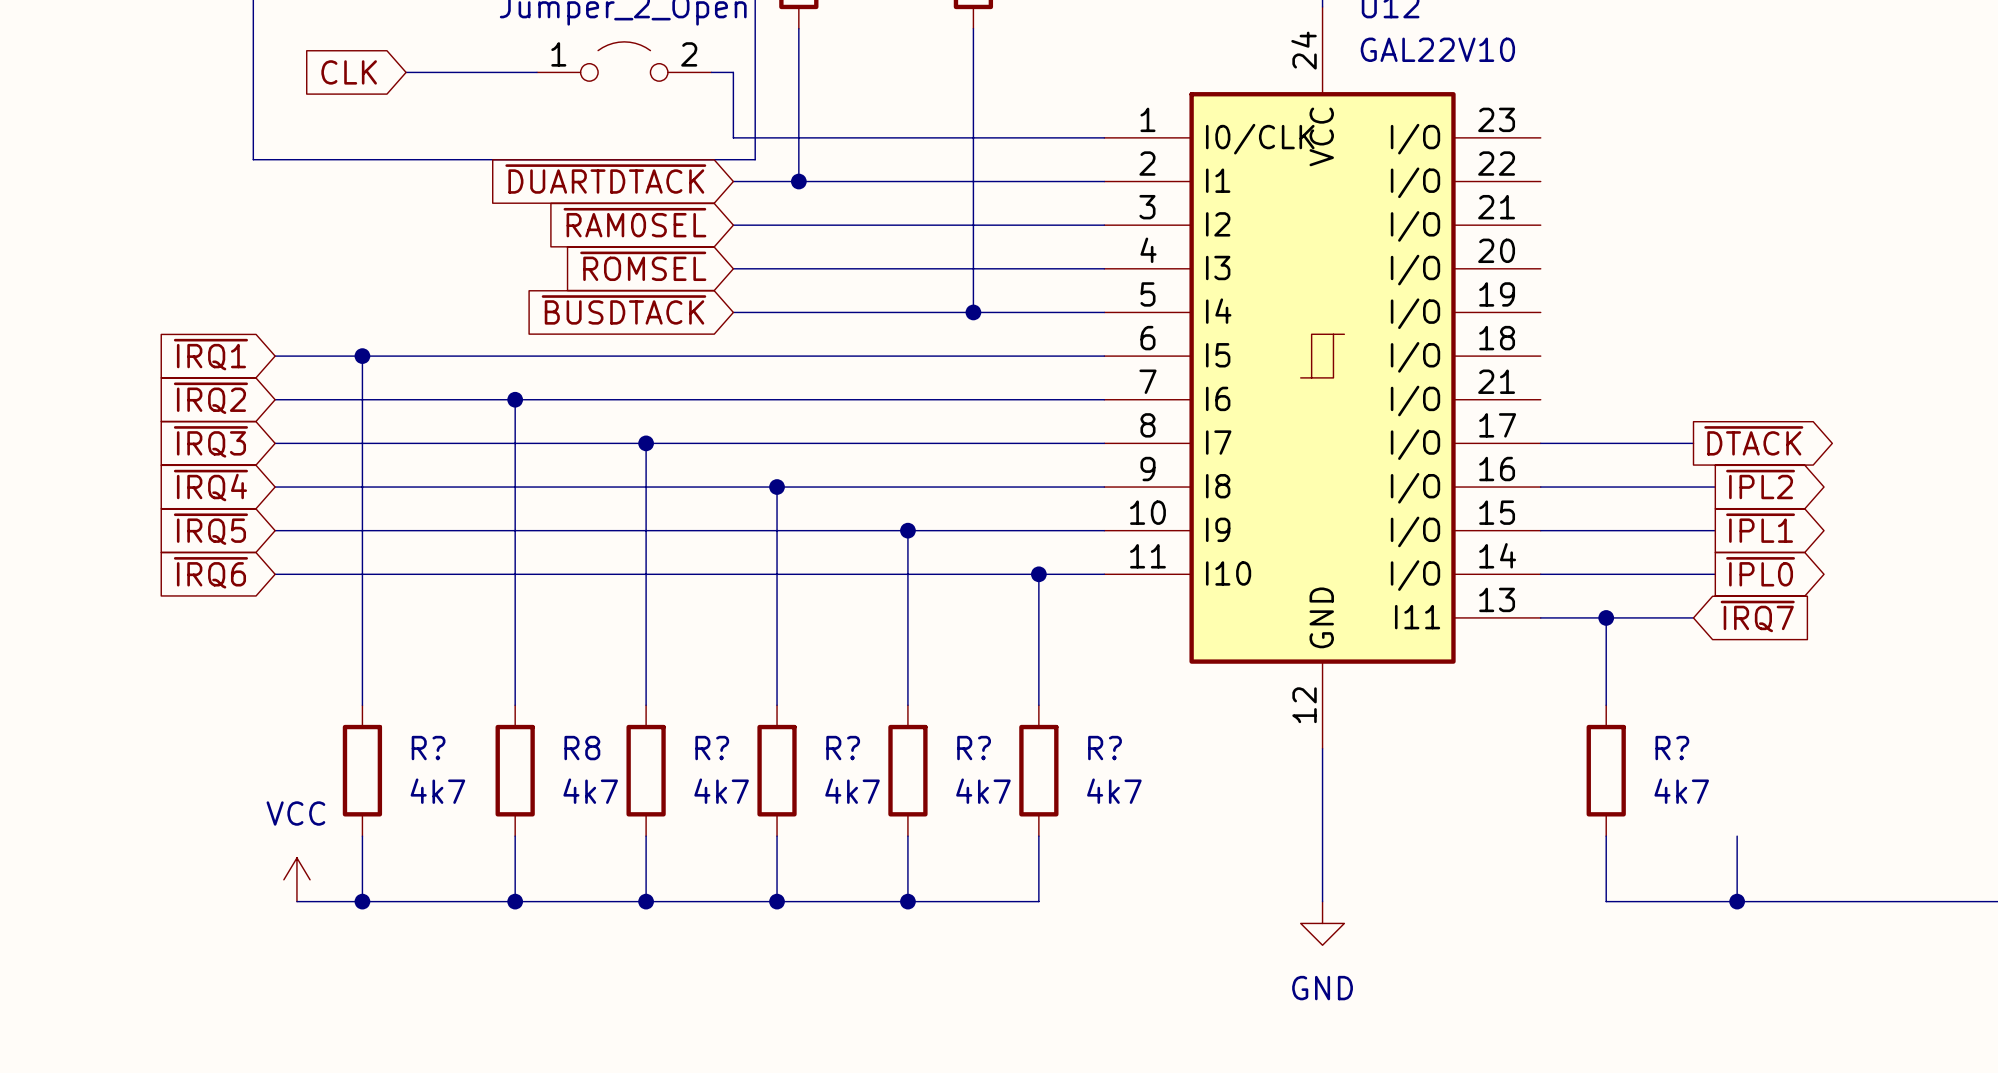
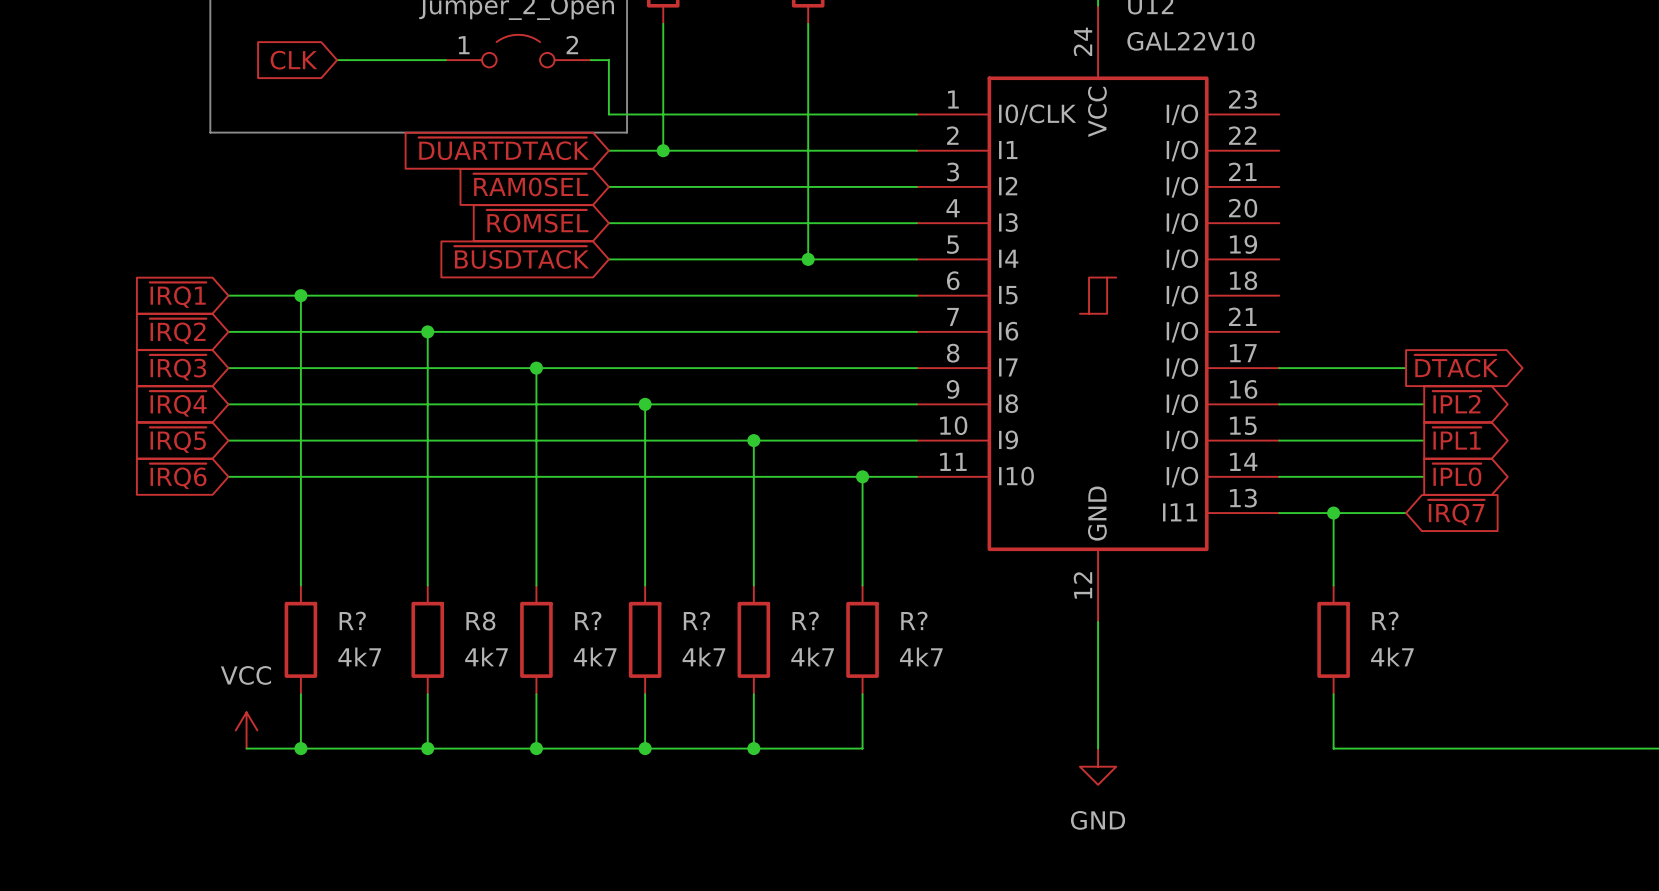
wire: (1737, 836) (1737, 901) -> none
junction: (1737, 901) -> none

